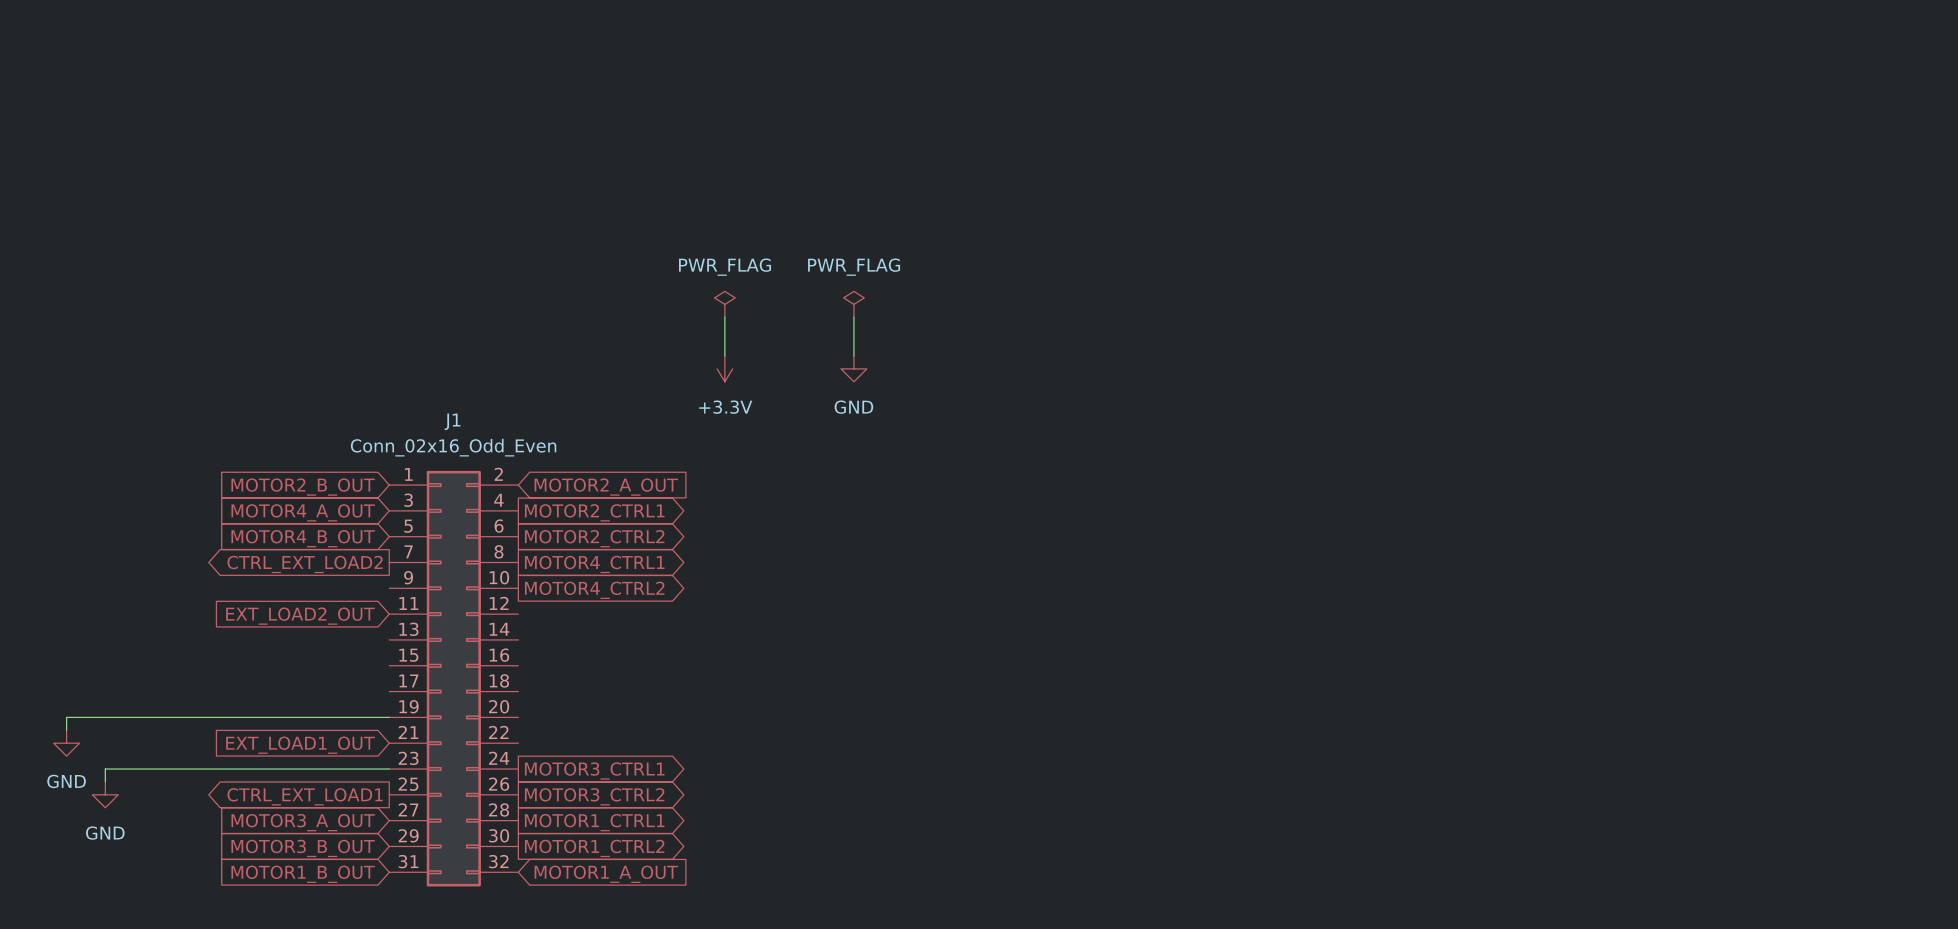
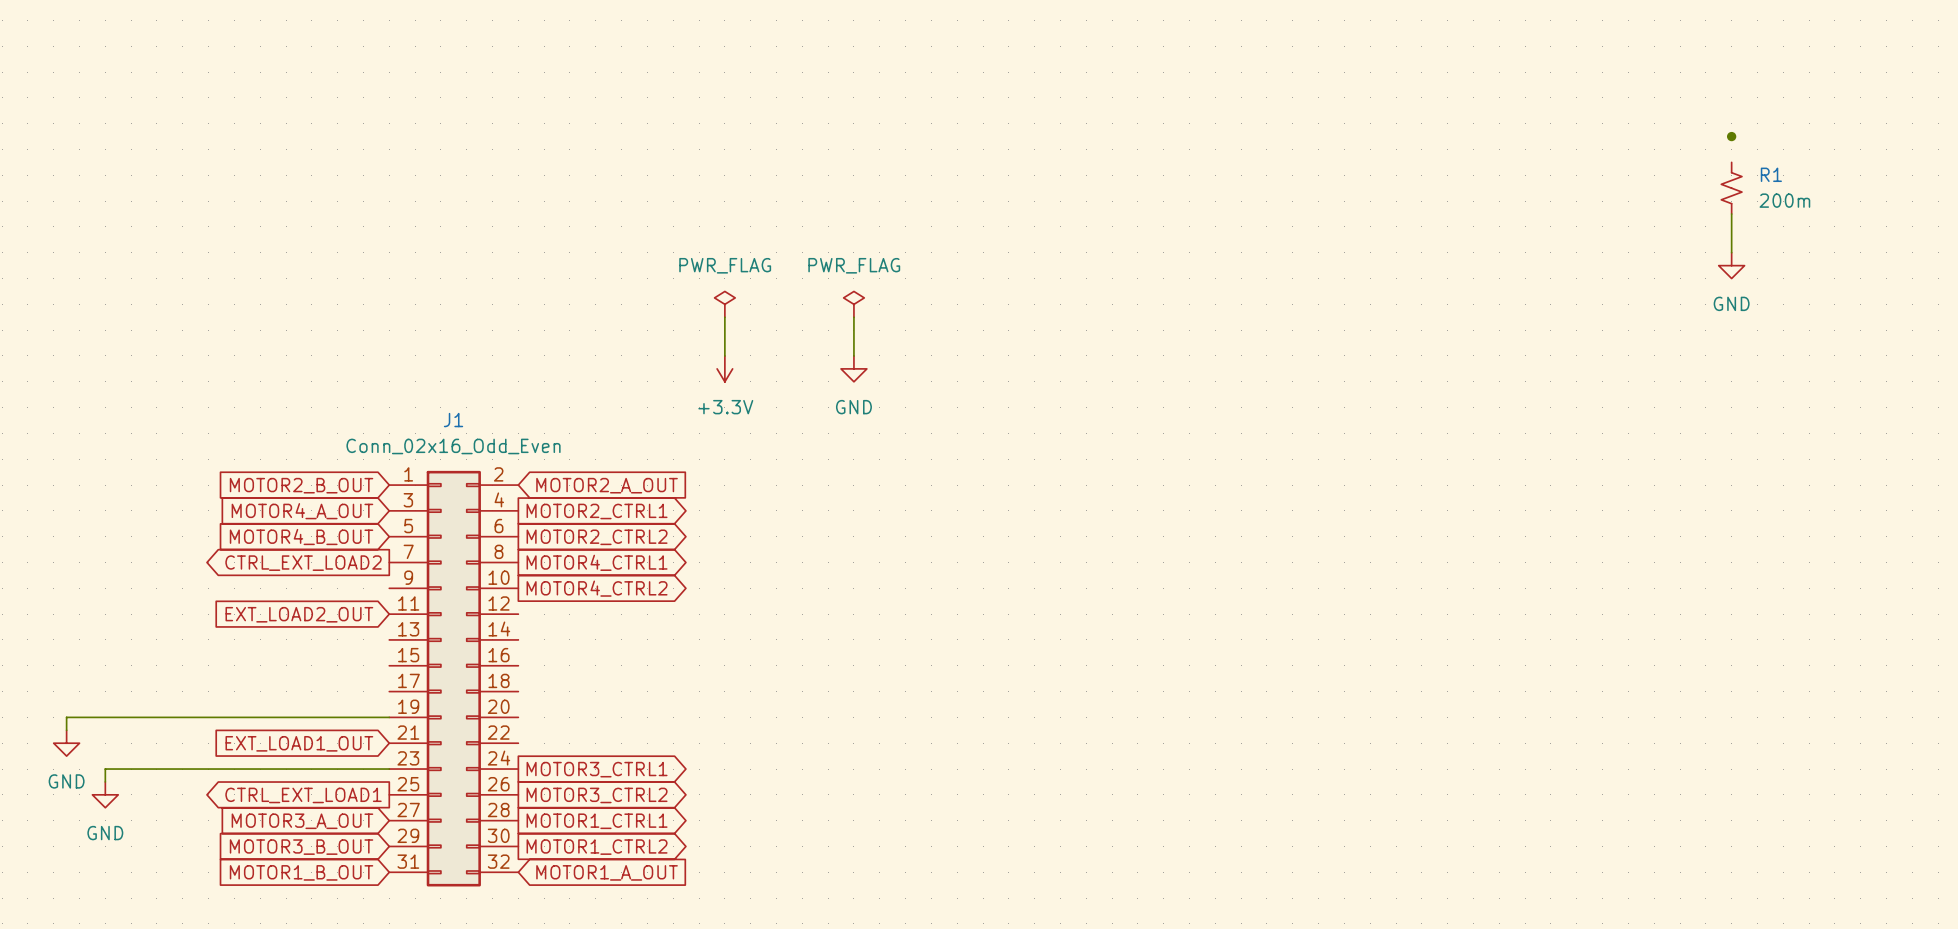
junction: none -> (1731, 136)
R1: none -> 200m (1731, 188)
wire: none -> (1731, 214) (1731, 252)
power symbol: none -> GND (1731, 265)

